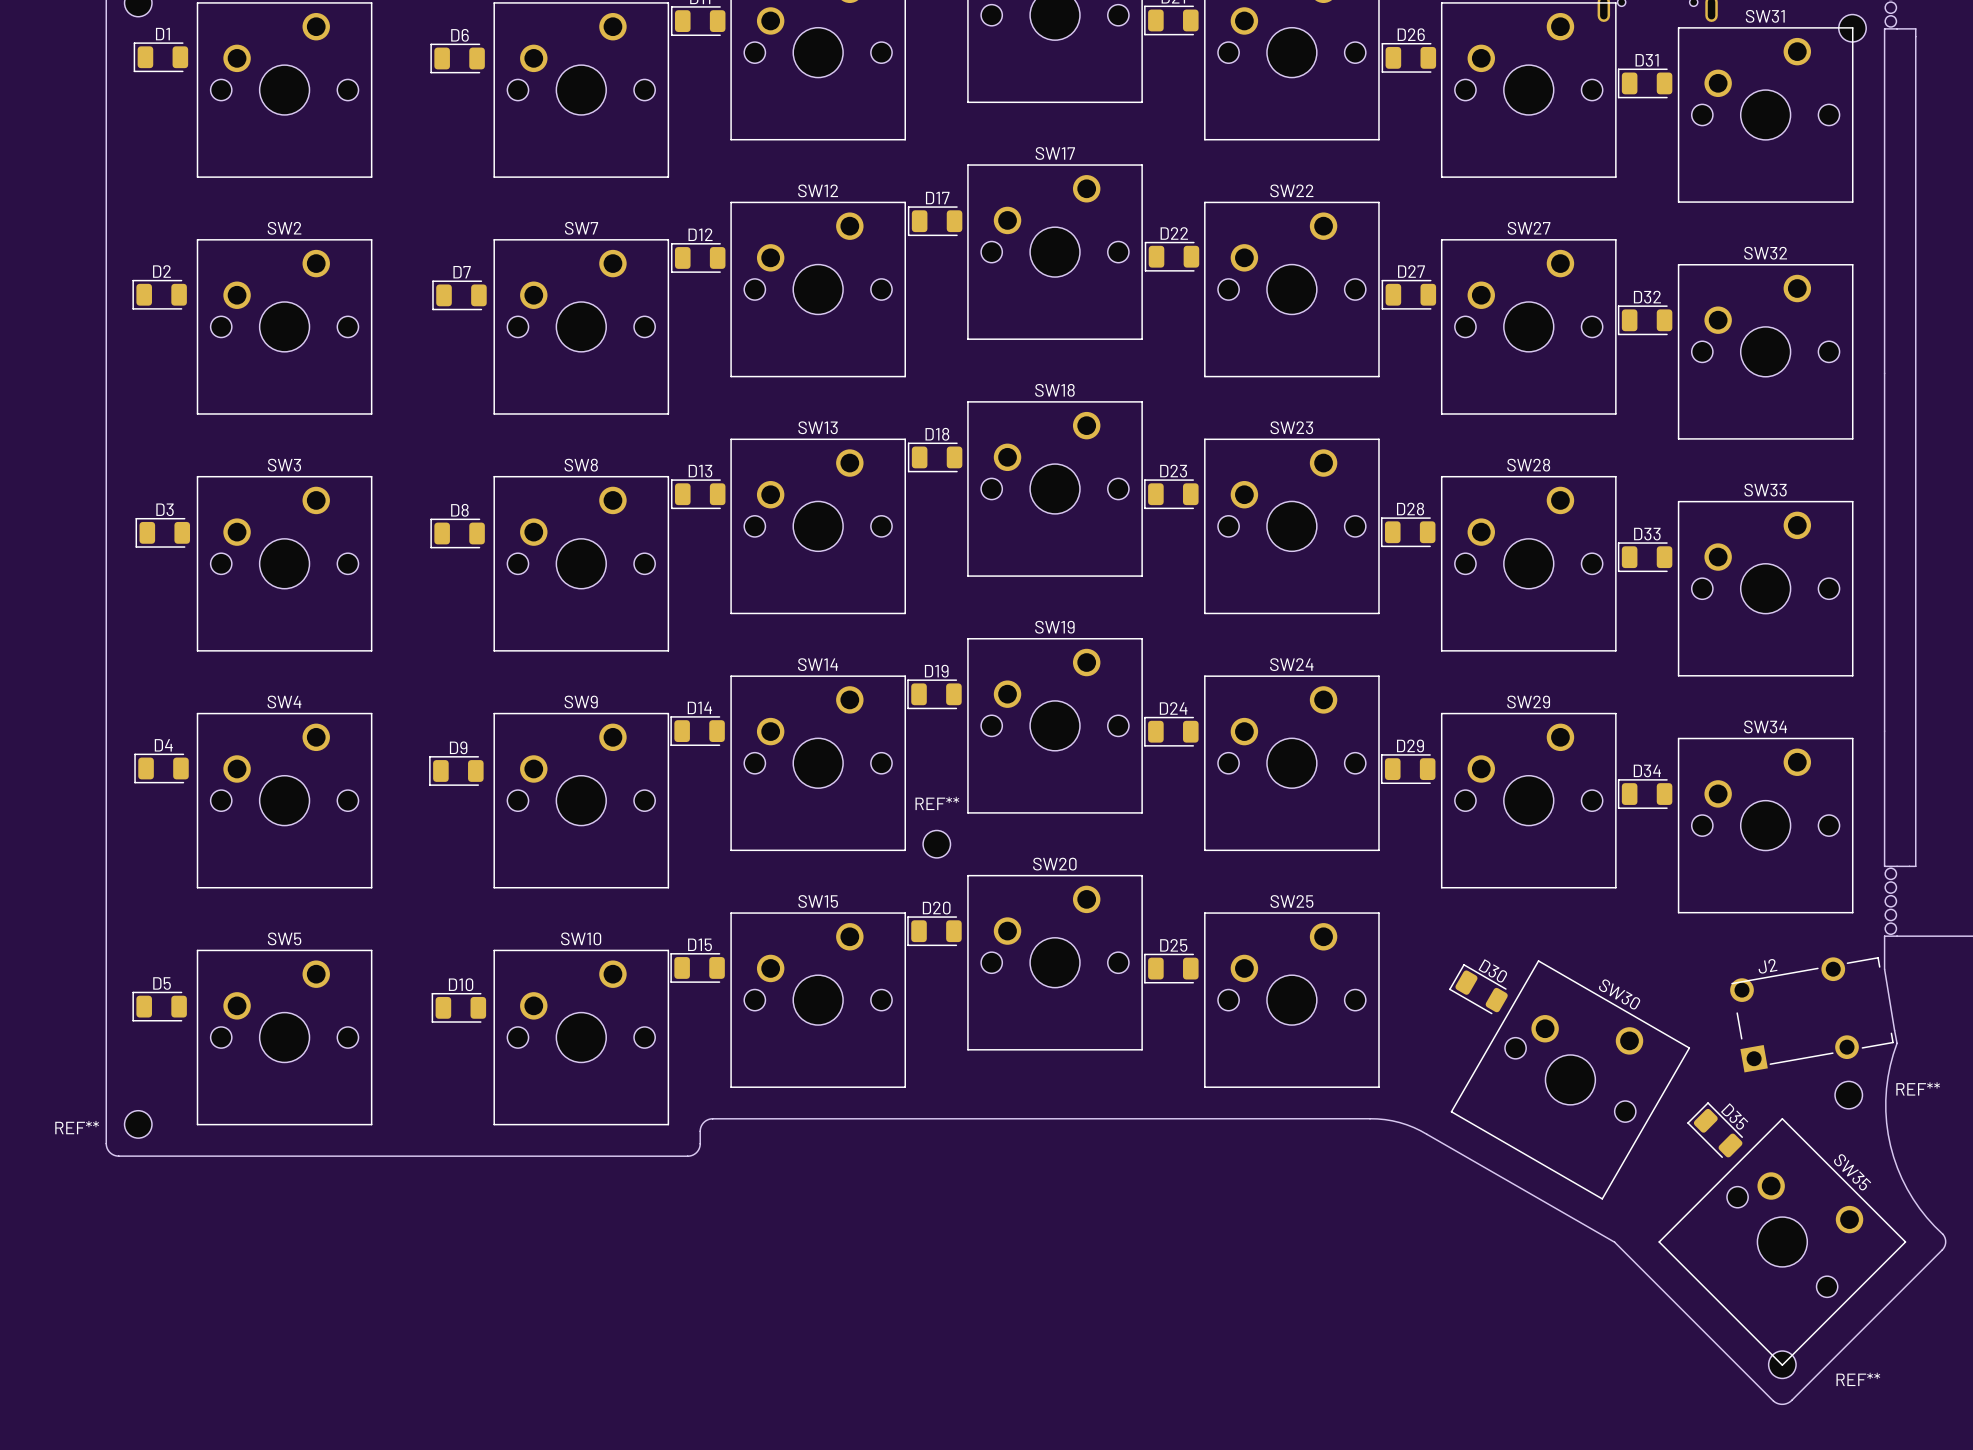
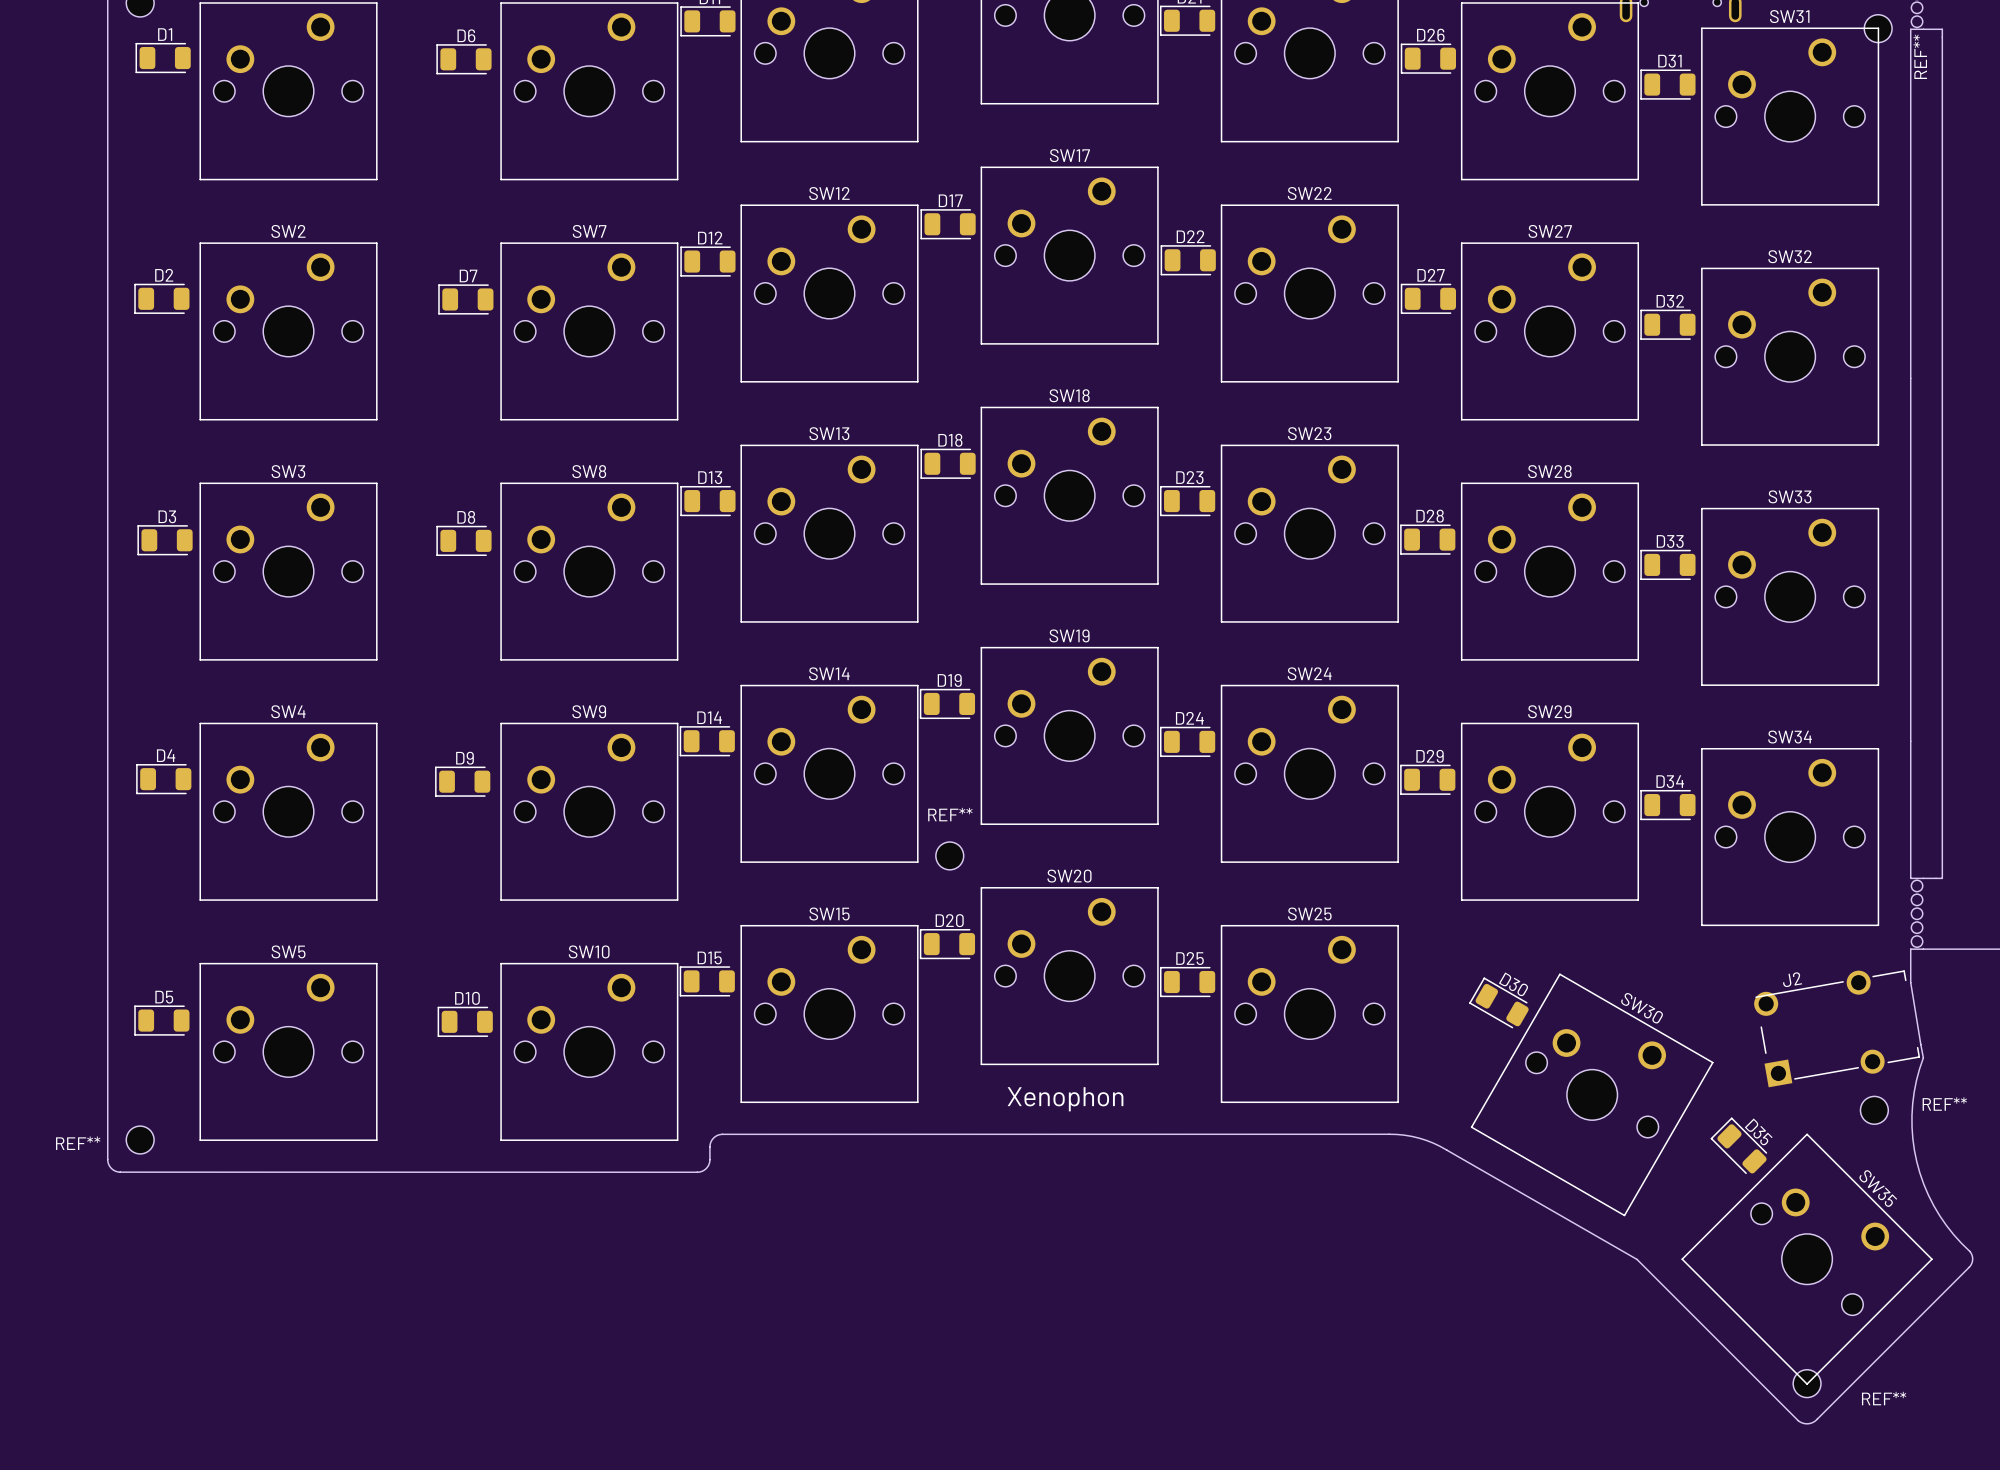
REF** name: none -> REF** (1920, 56)
text: none -> Xenophon (1065, 1099)

